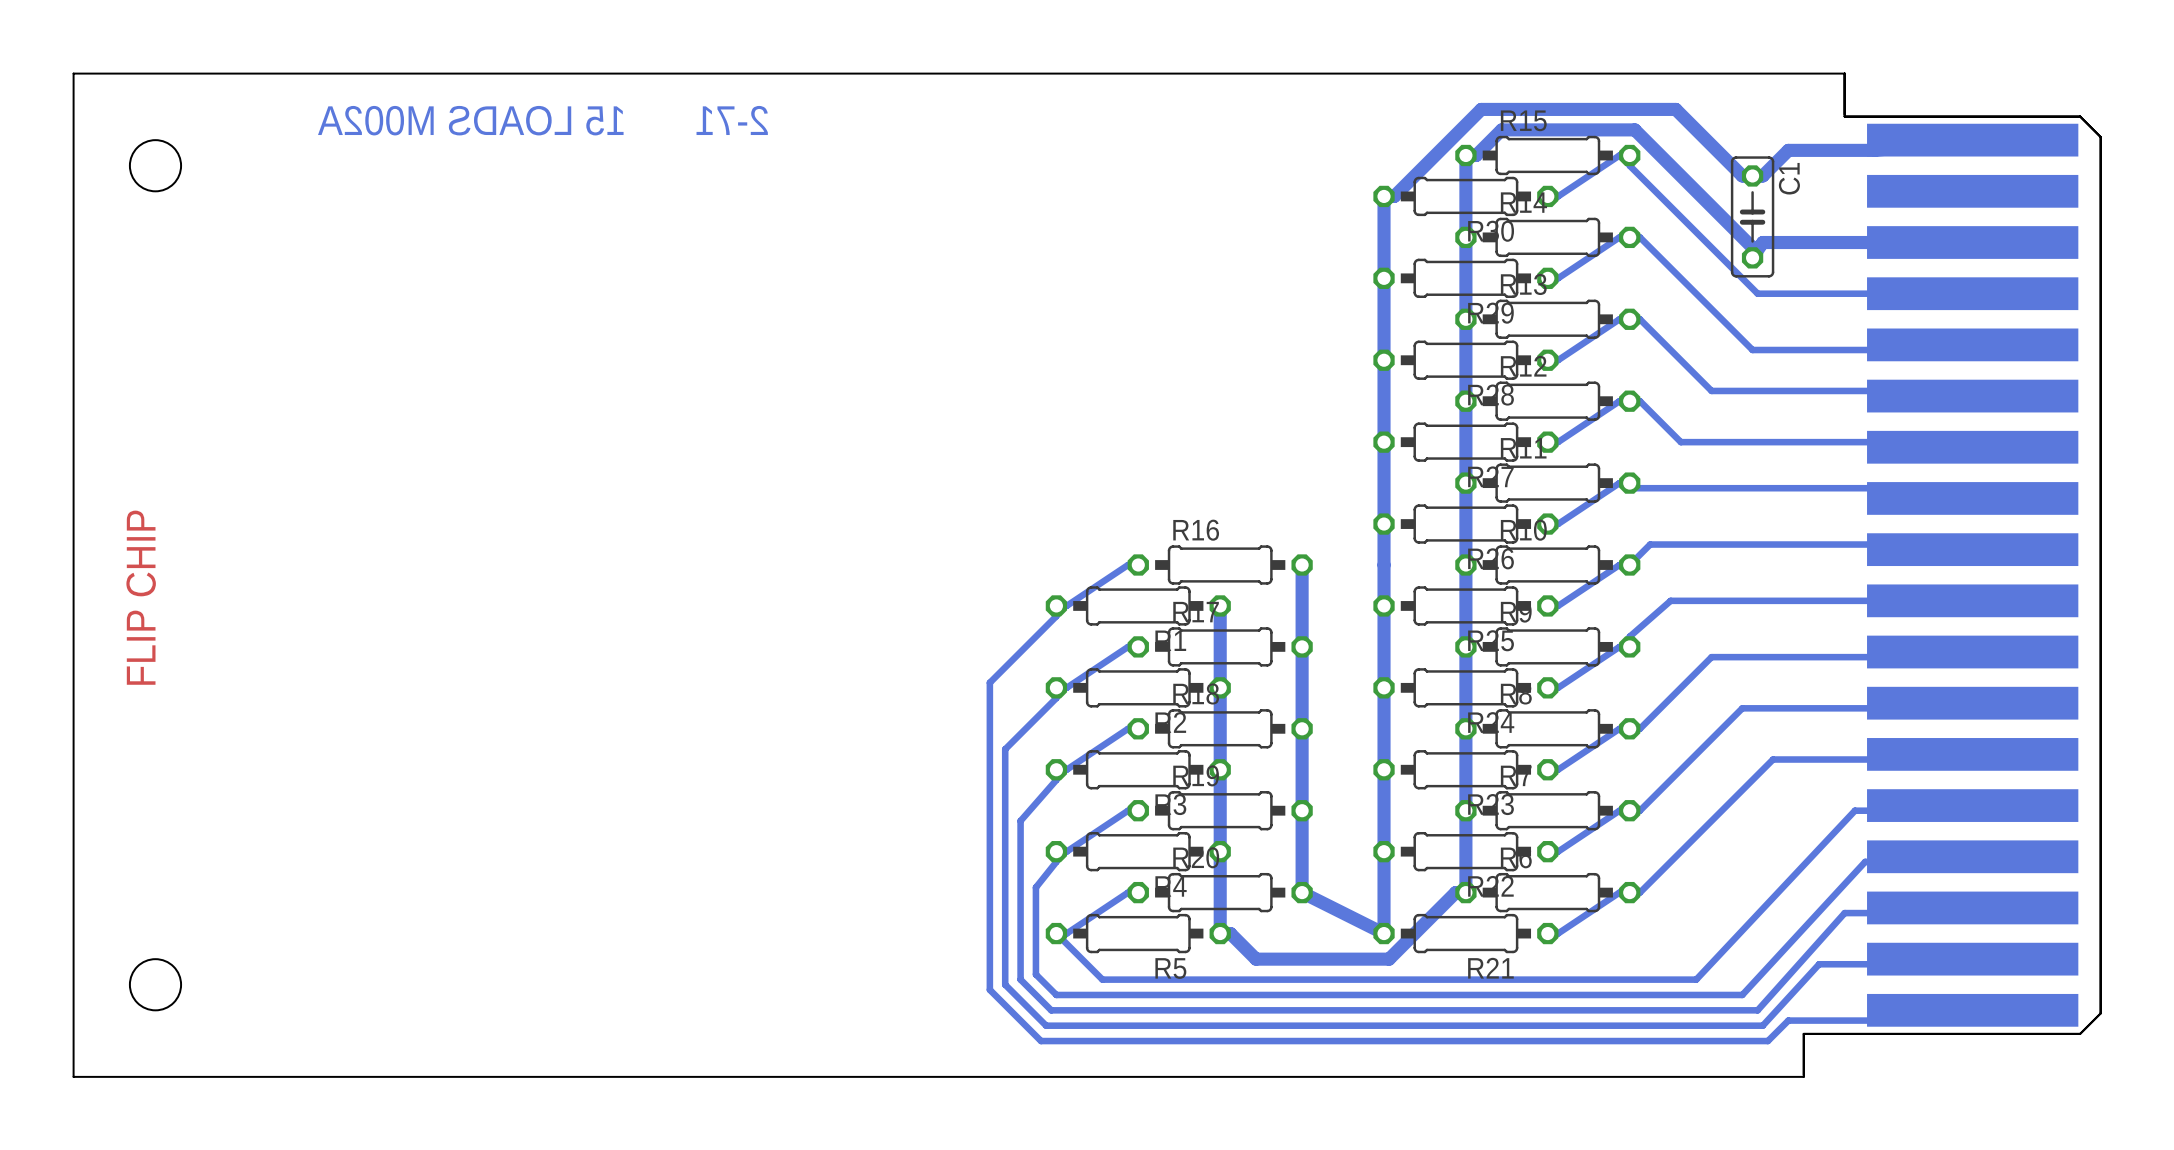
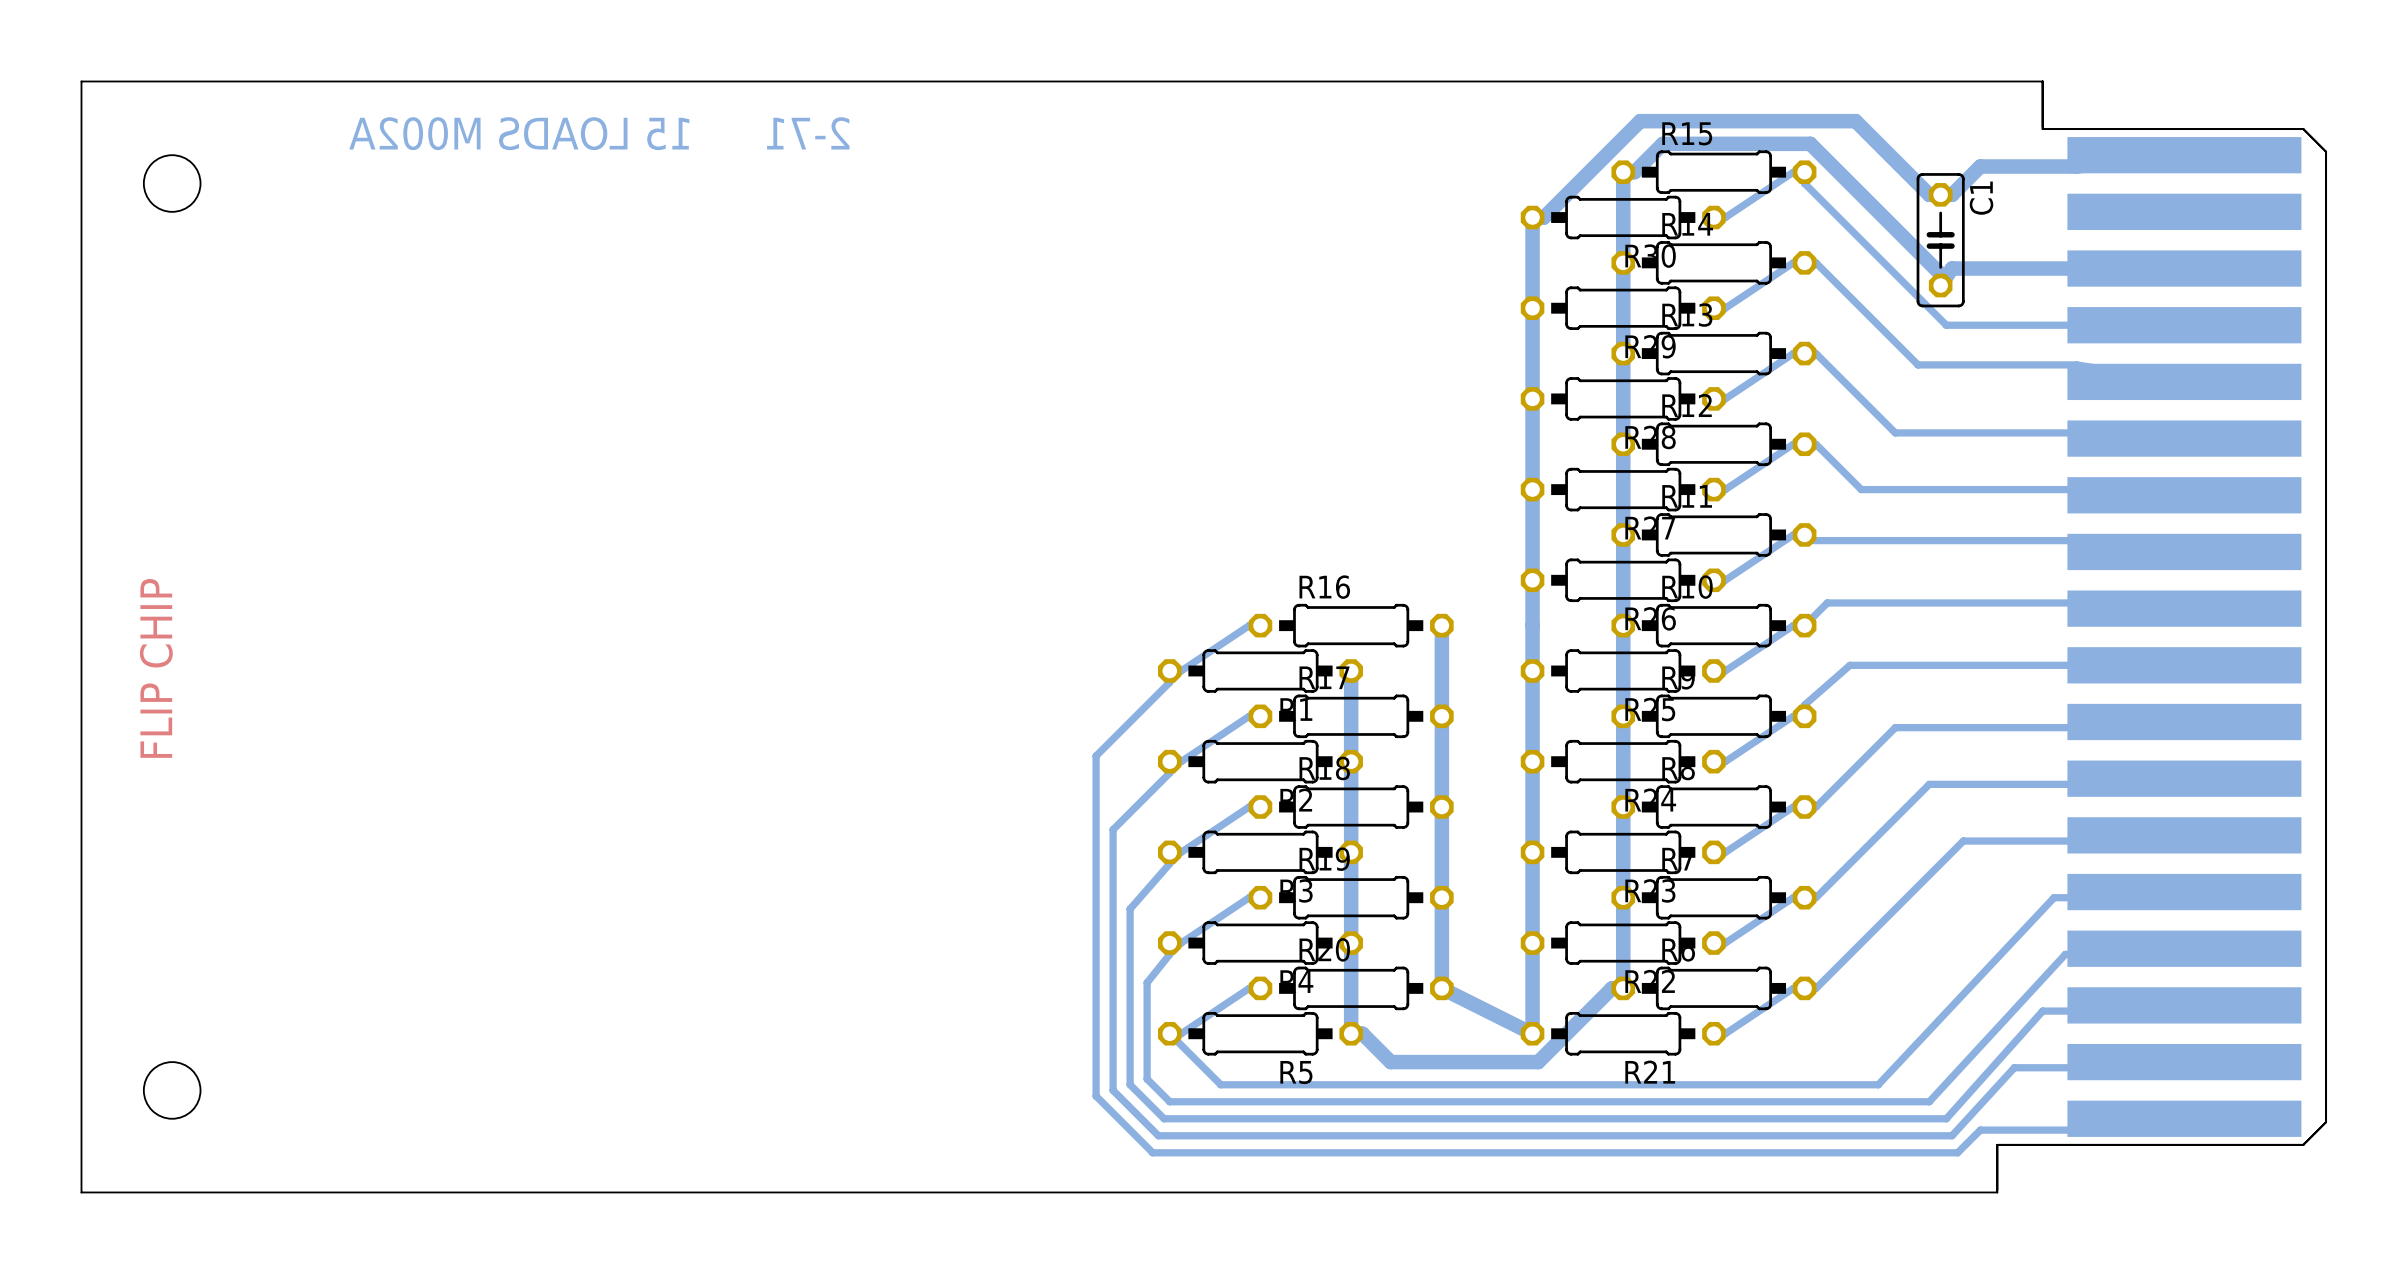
bottom track: (1732, 329) (1752, 350) (1895, 350) (1972, 344) -> (1917, 364) (2076, 364) (2184, 381)

